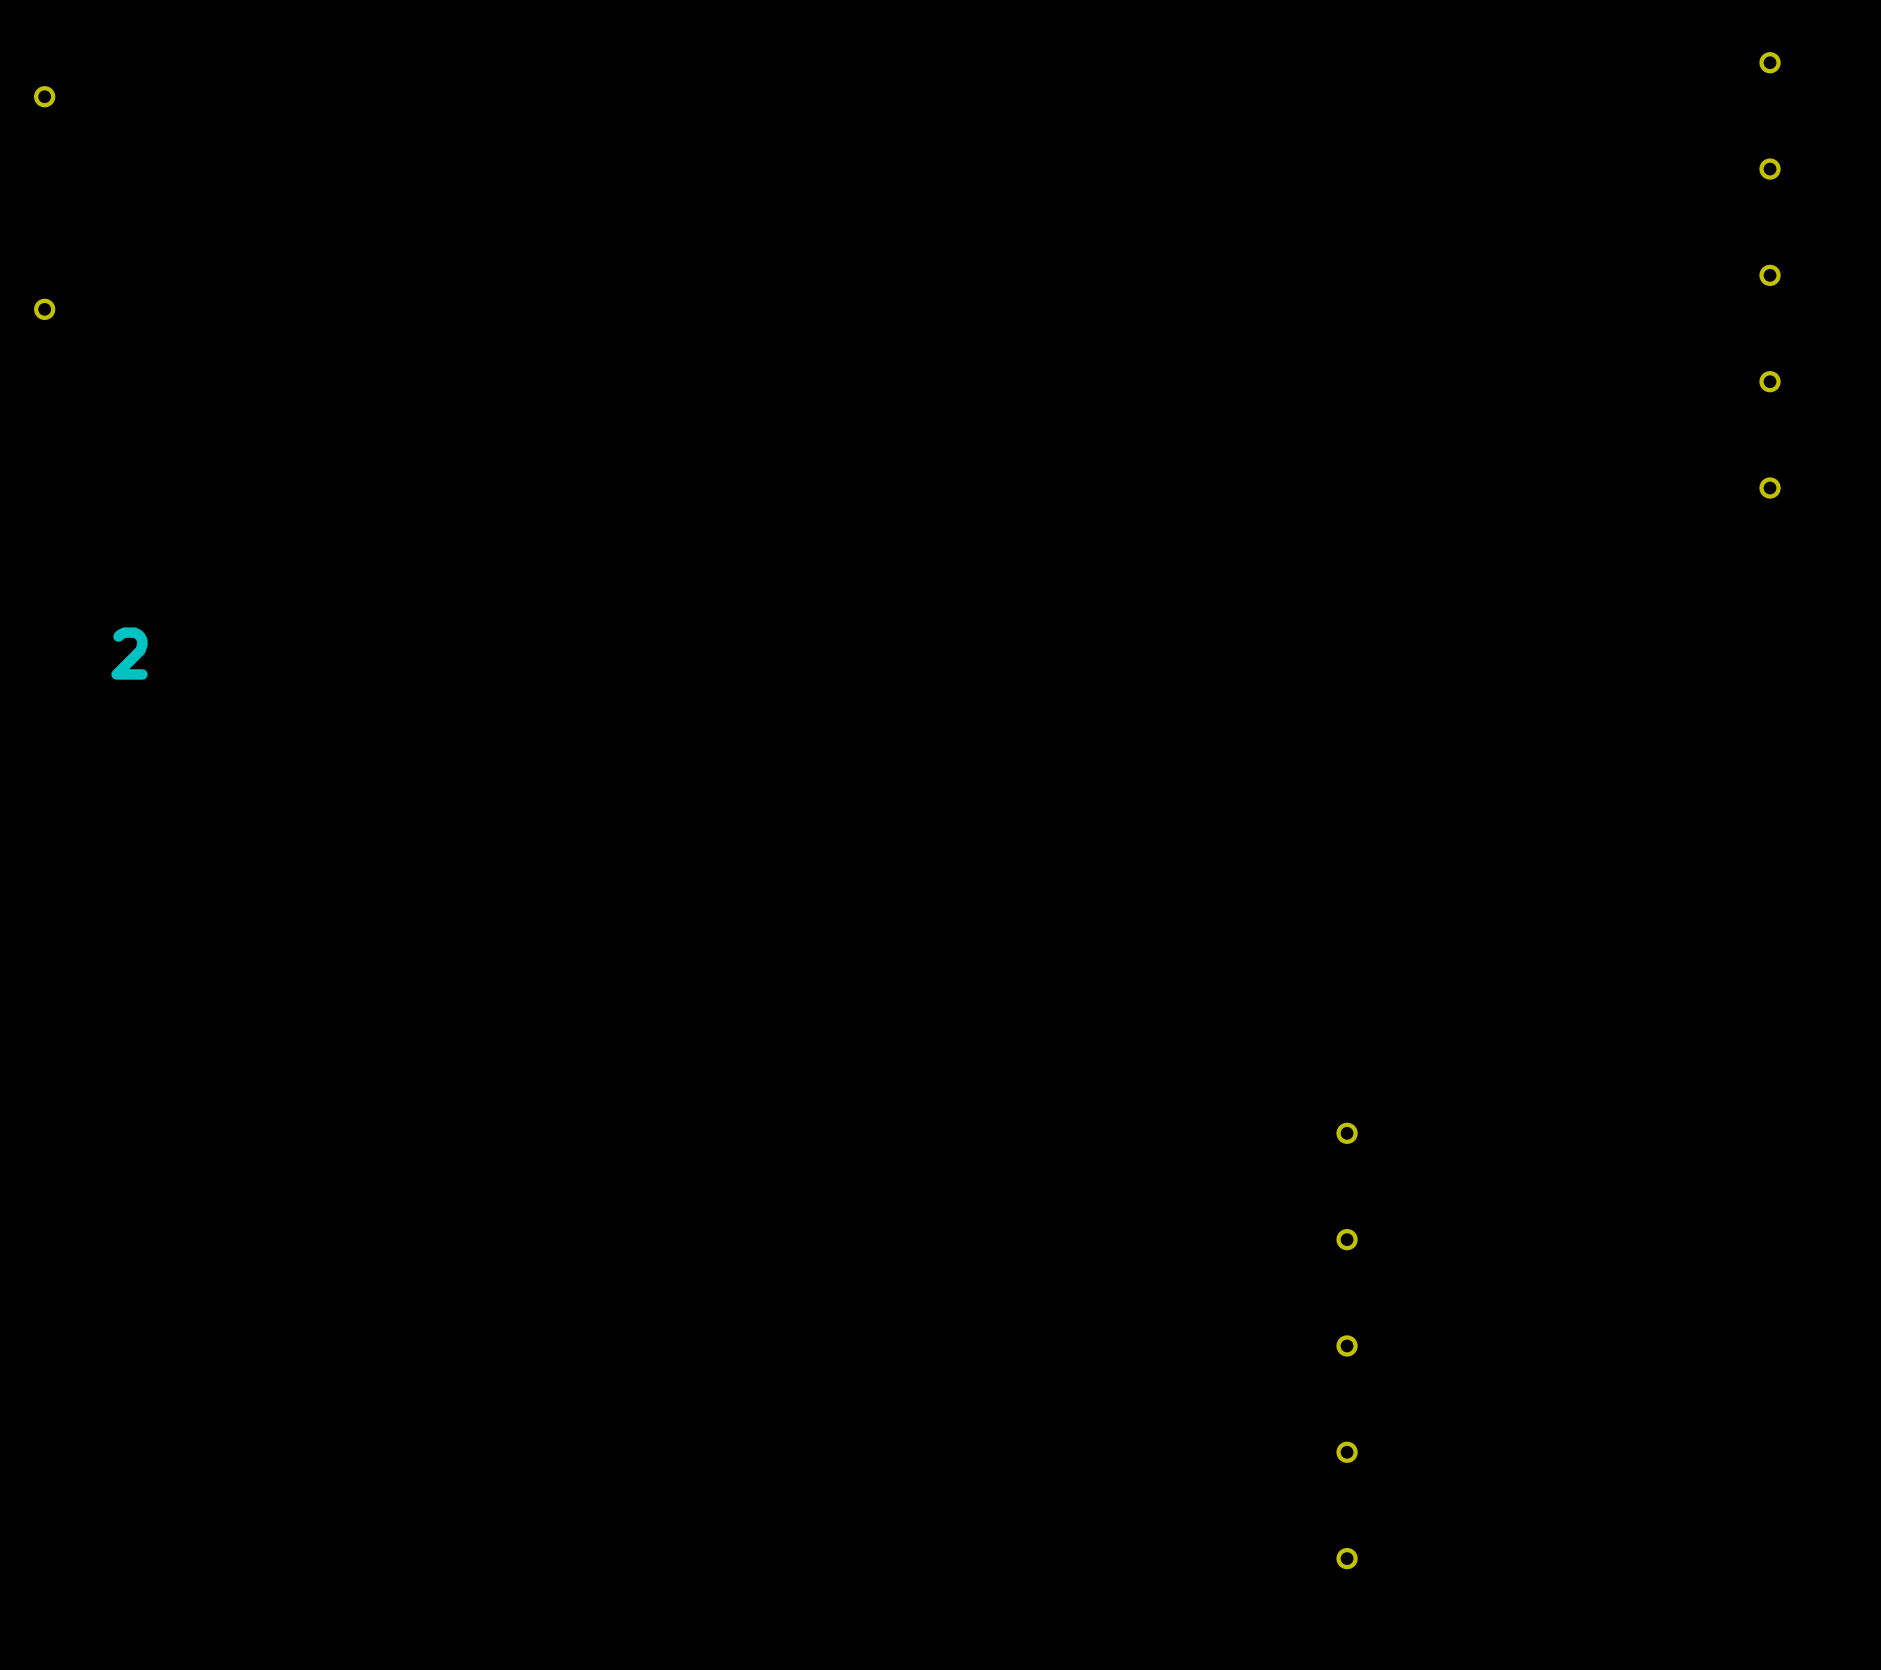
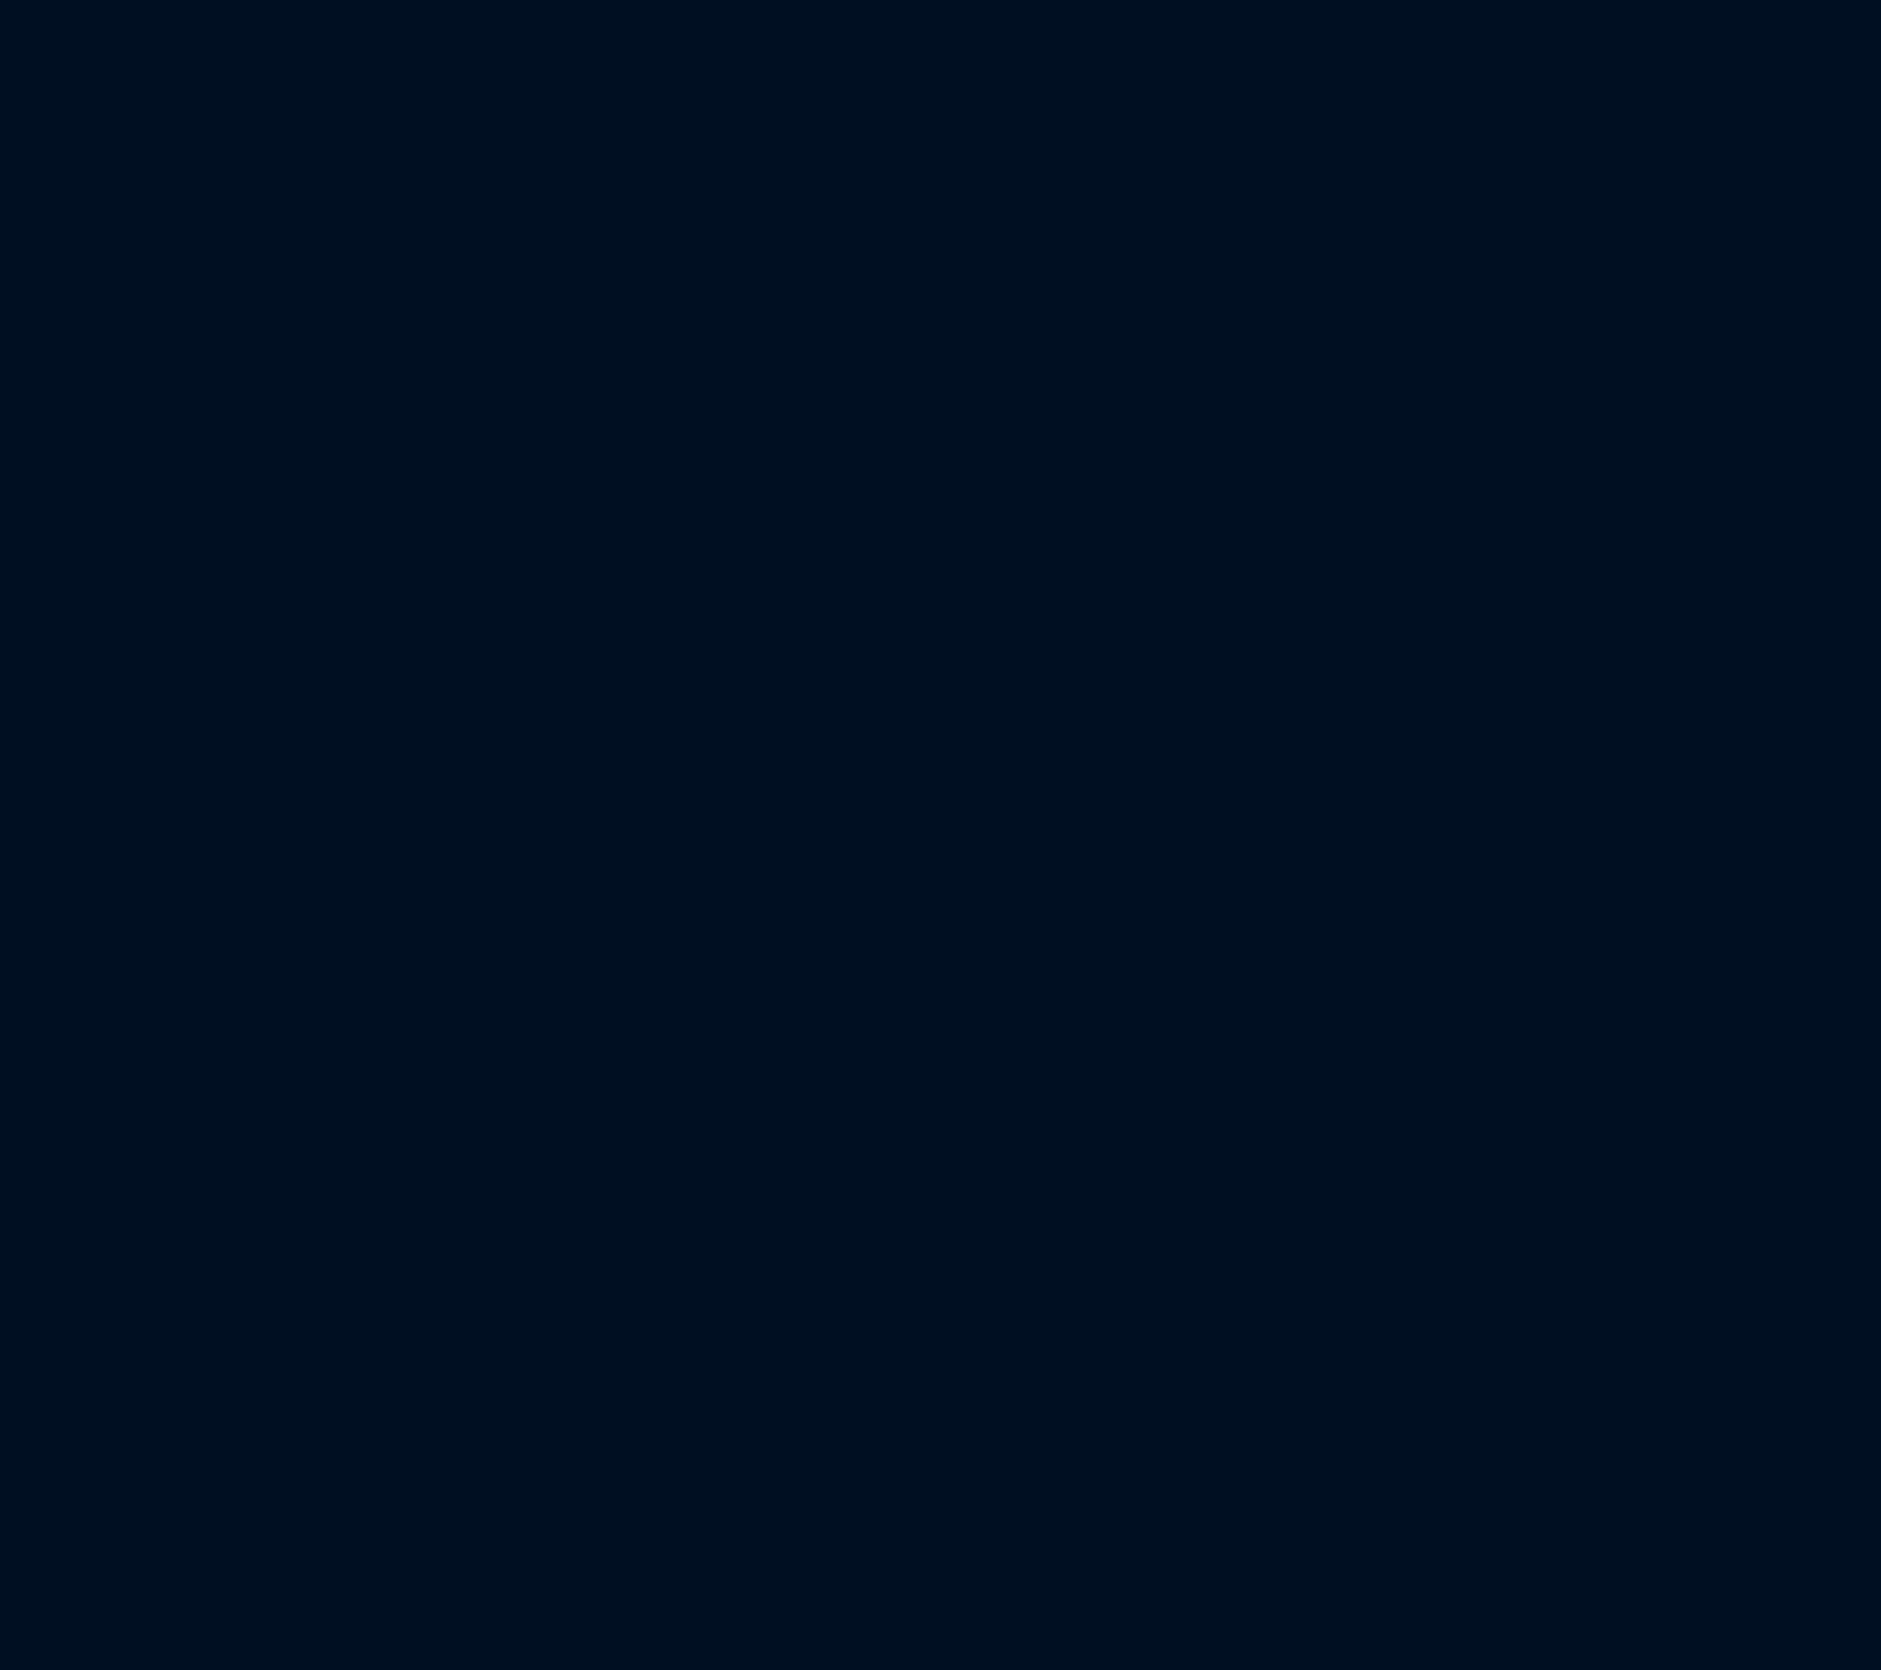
part: (1770, 62) -> none
part: (44, 96) -> none
part: (1770, 169) -> none
part: (1770, 275) -> none
part: (44, 309) -> none
part: (1770, 381) -> none
part: (1770, 488) -> none
text: 2 (129, 653) -> none
part: (1347, 1133) -> none
part: (1347, 1239) -> none
part: (1347, 1345) -> none
part: (1347, 1452) -> none
part: (1347, 1558) -> none

